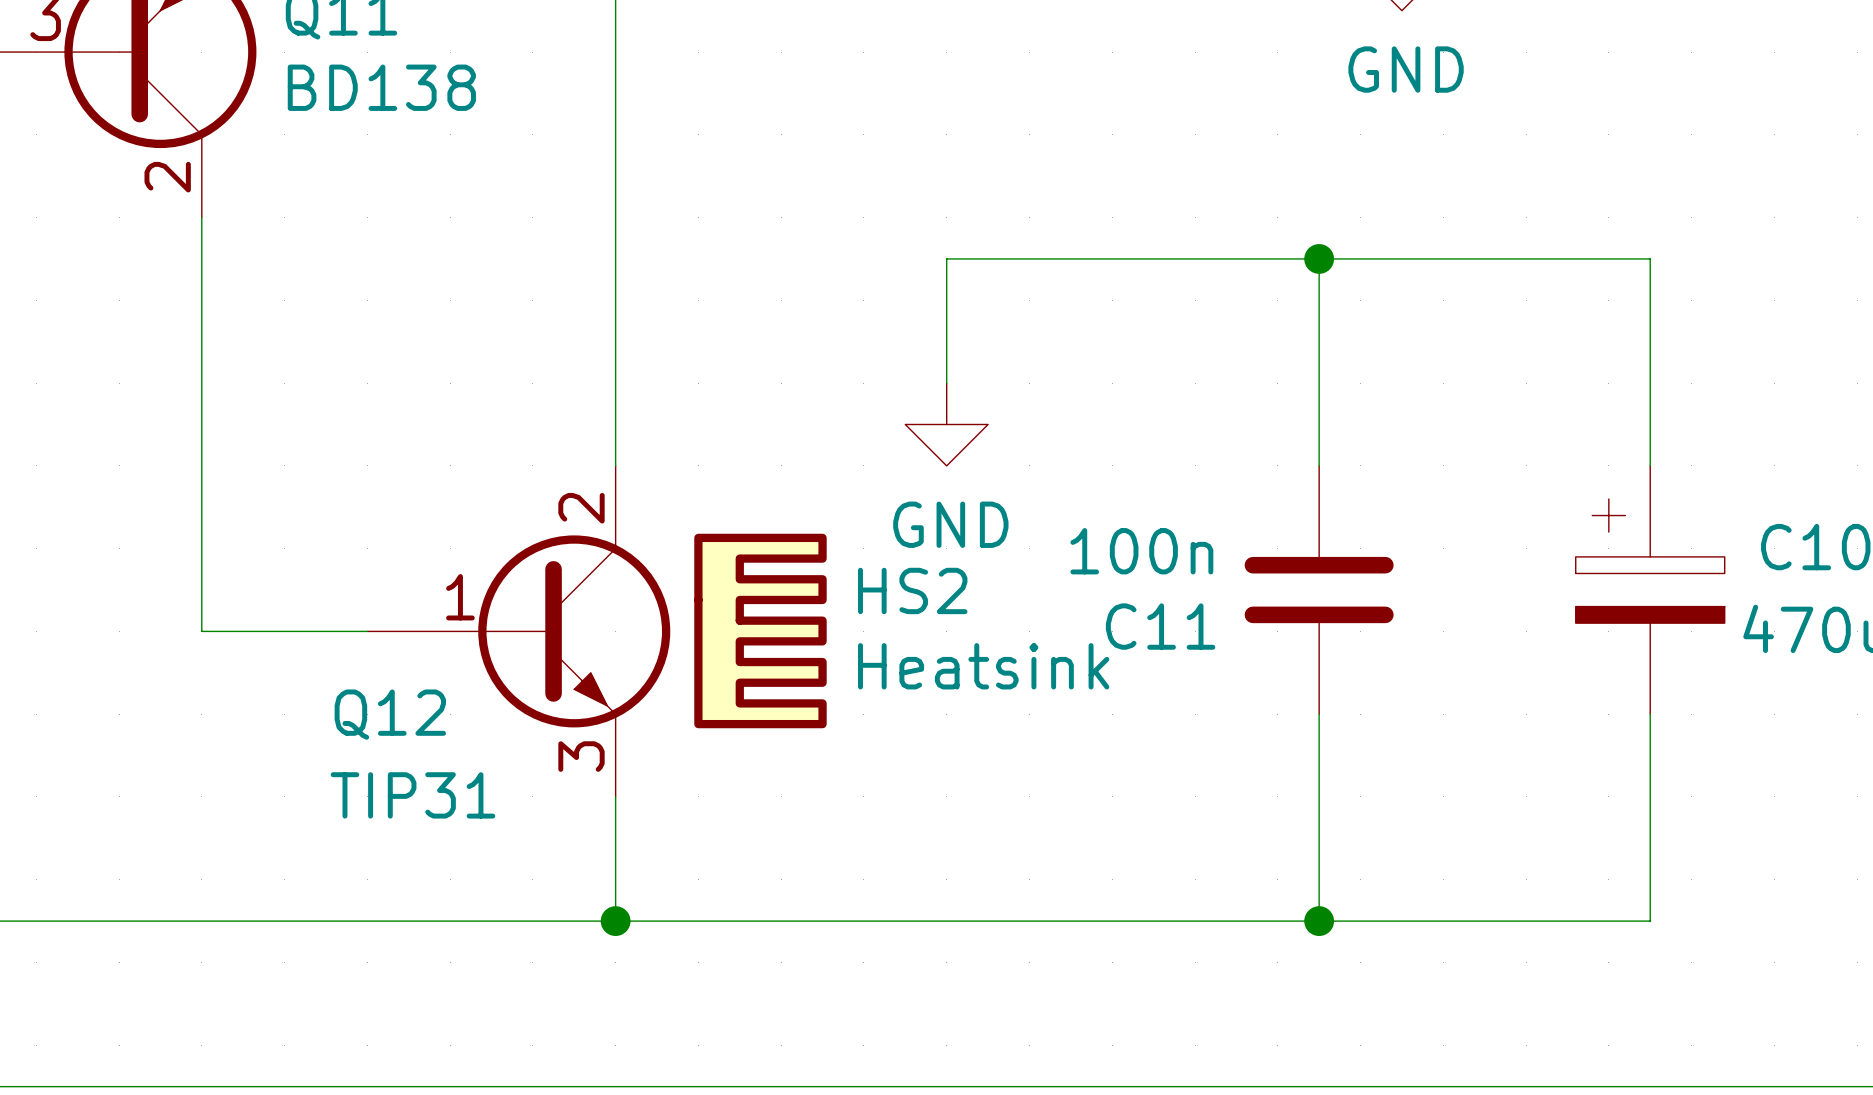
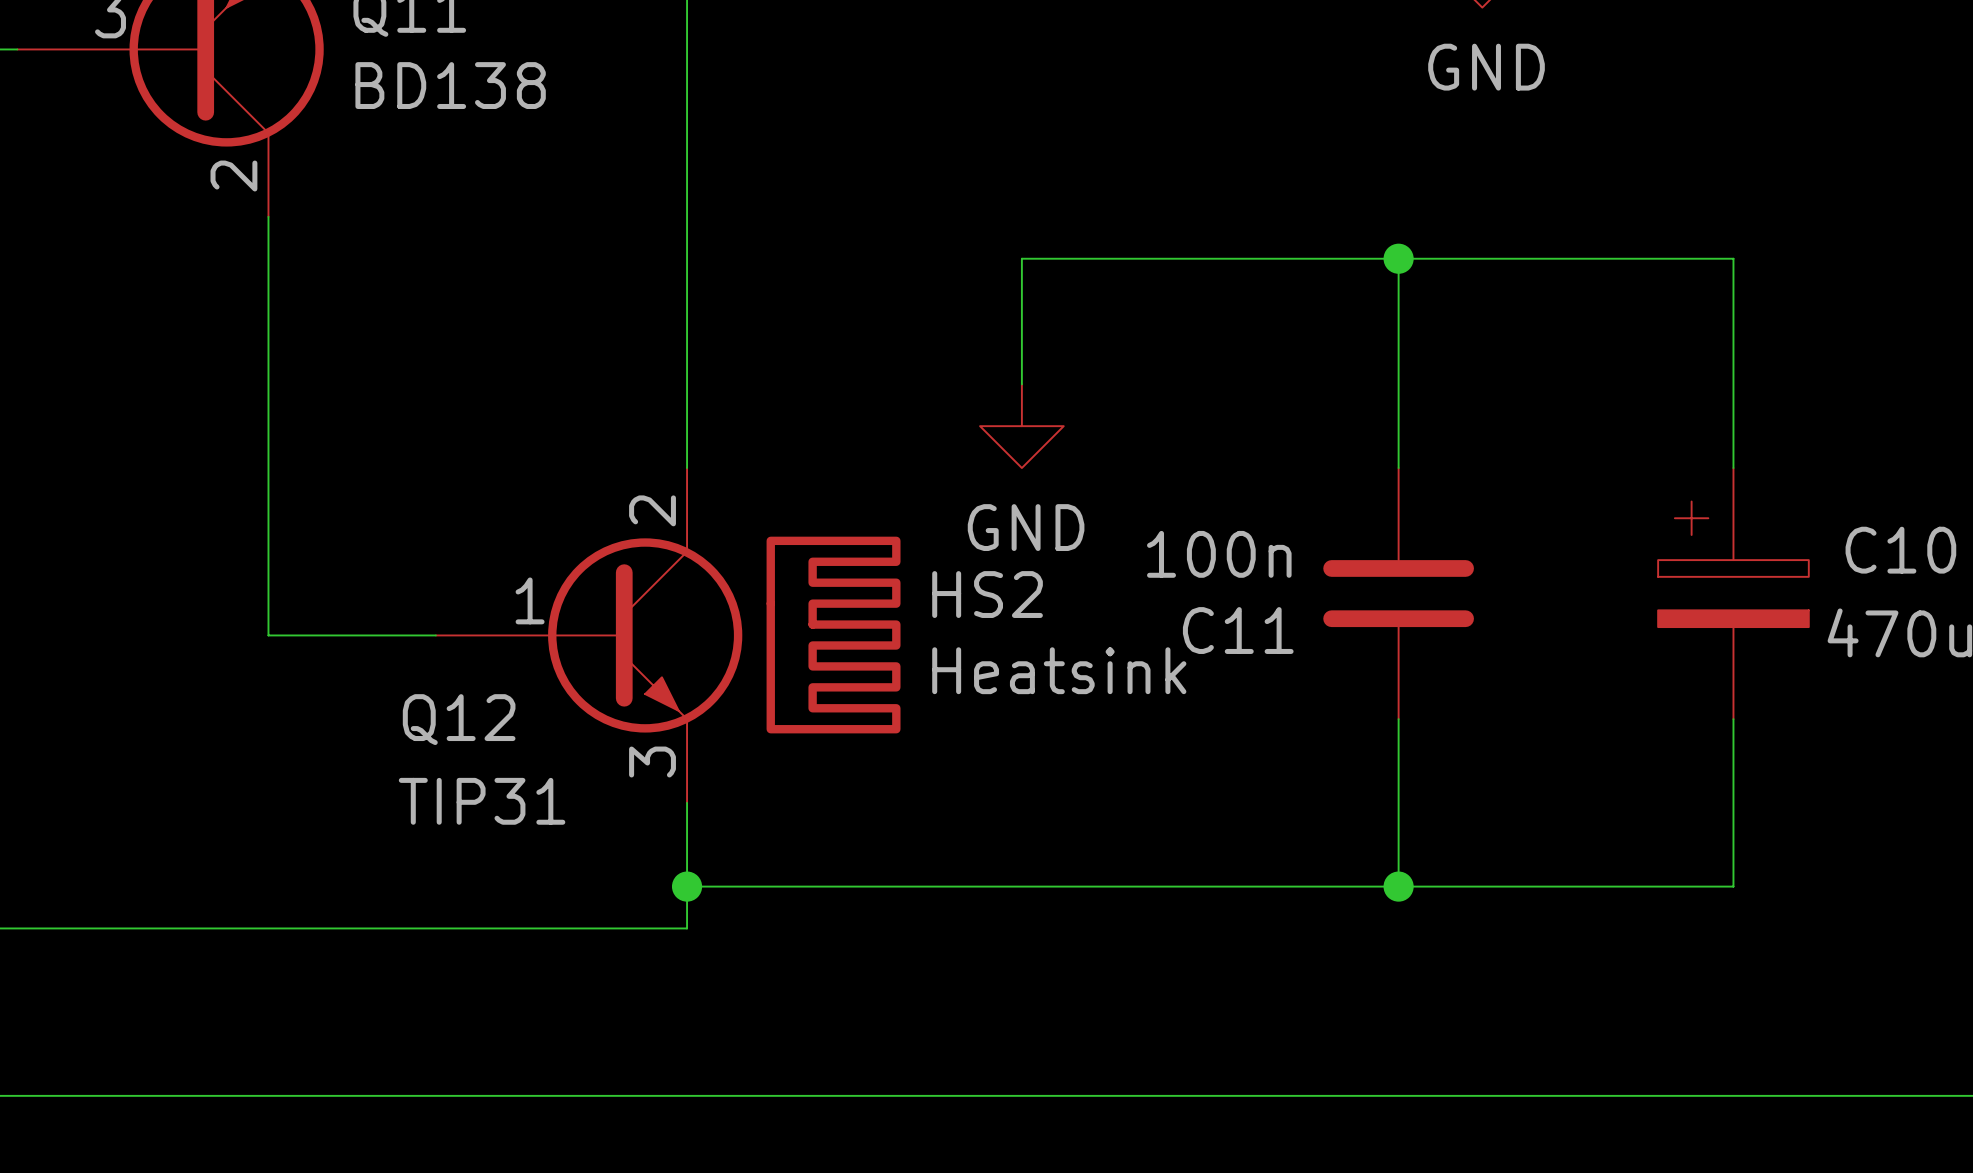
wire: (1319, 879) (1319, 921) -> none
wire: (1650, 879) (1650, 921) (615, 921) -> (1733, 886) (687, 886)
junction position: (615, 921) -> (687, 886)
junction position: (1319, 921) -> (1398, 886)

